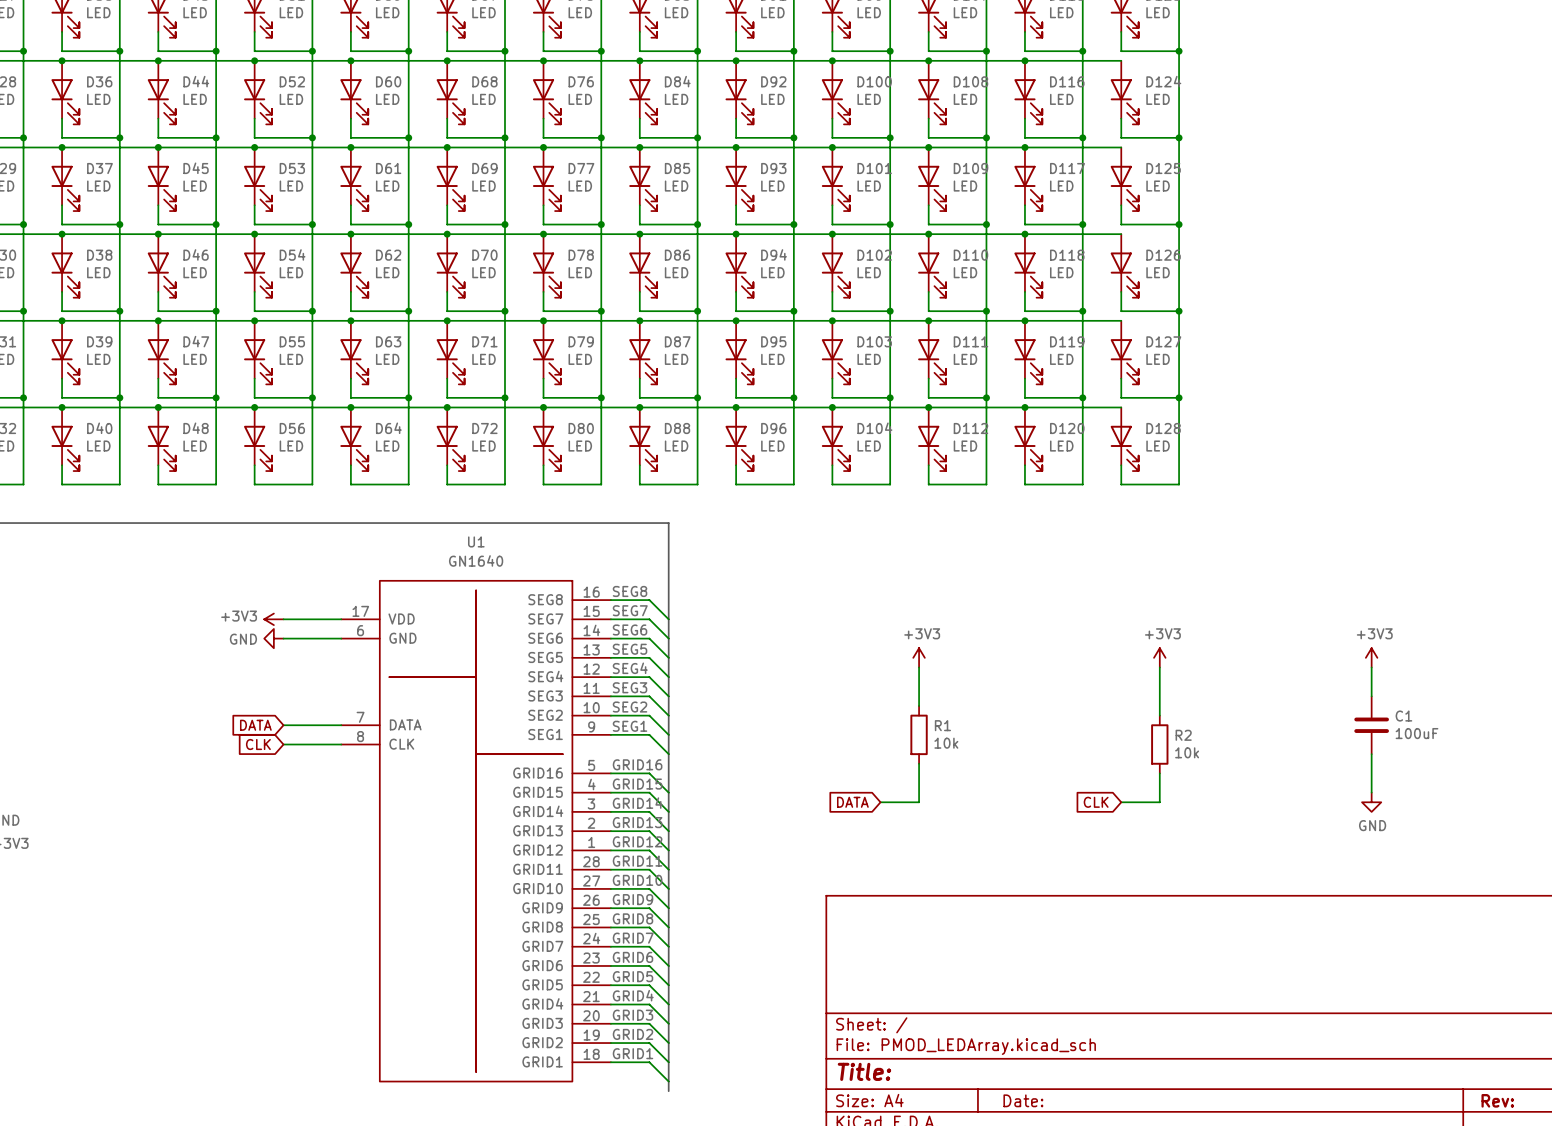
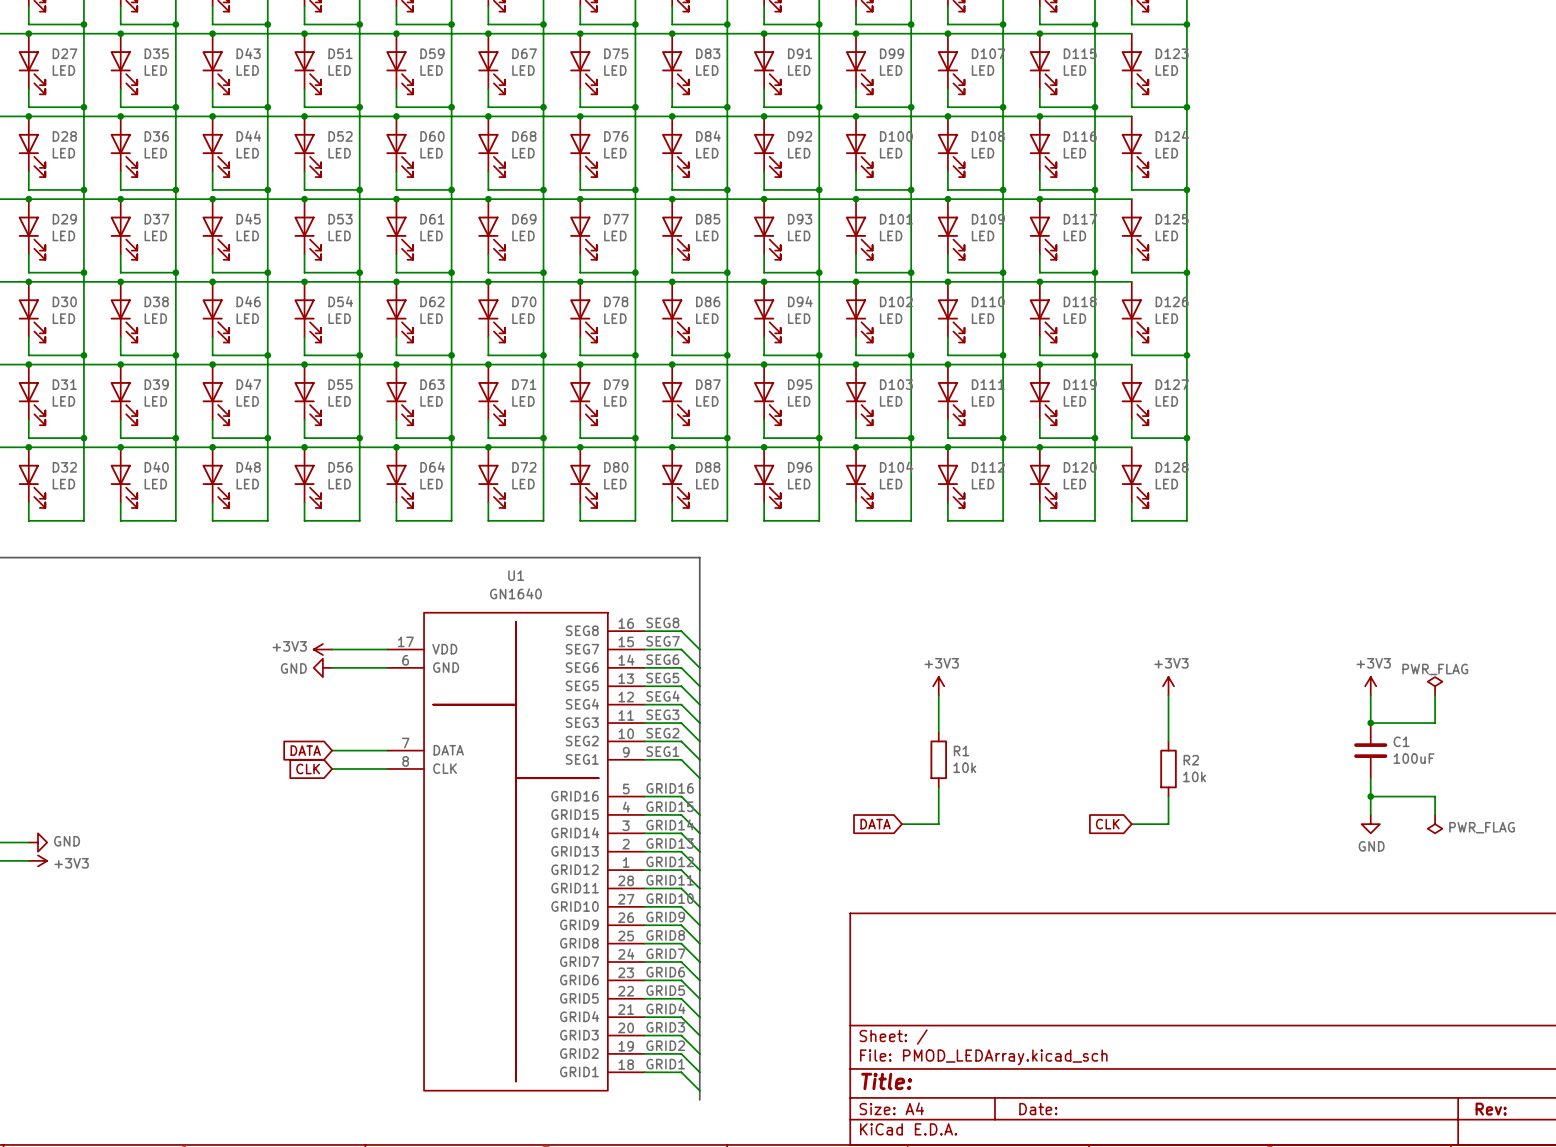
power symbol: none -> PWR_FLAG (1435, 686)
wire: none -> (1435, 695) (1435, 723) (1370, 723)
junction: none -> (1370, 723)
wire: none -> (1370, 796) (1435, 796) (1435, 814)
junction: none -> (1370, 796)
power symbol: none -> PWR_FLAG (1435, 824)

